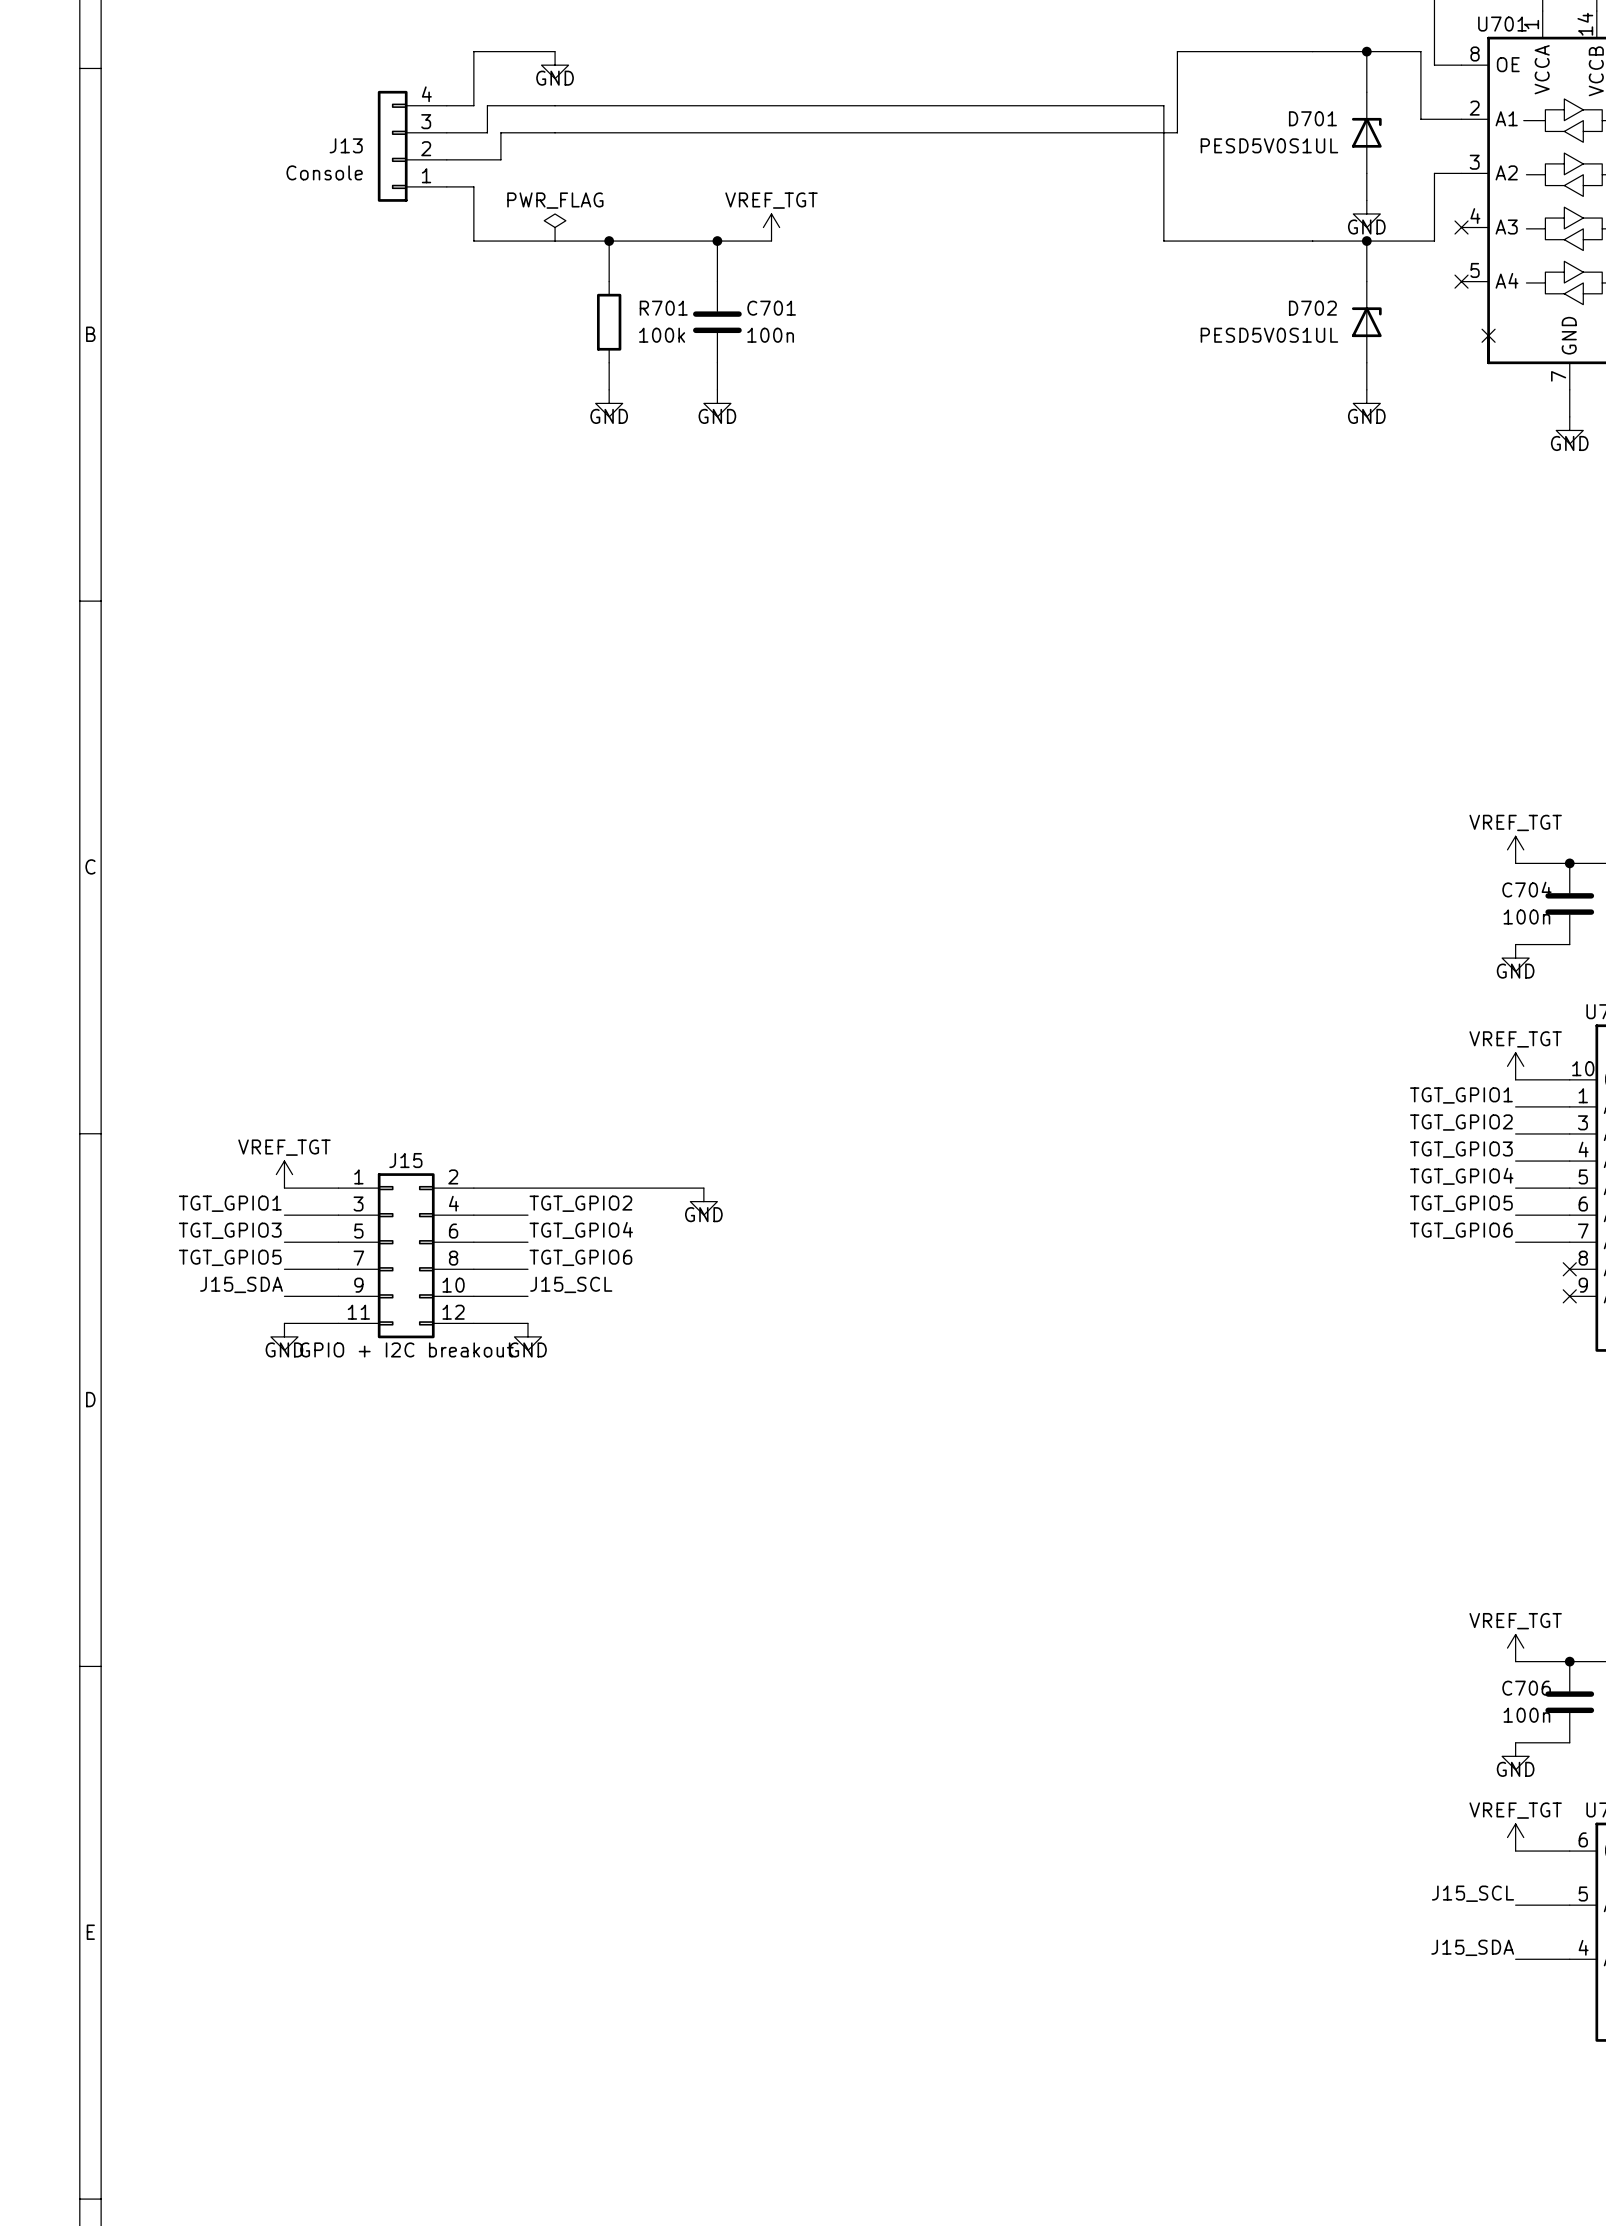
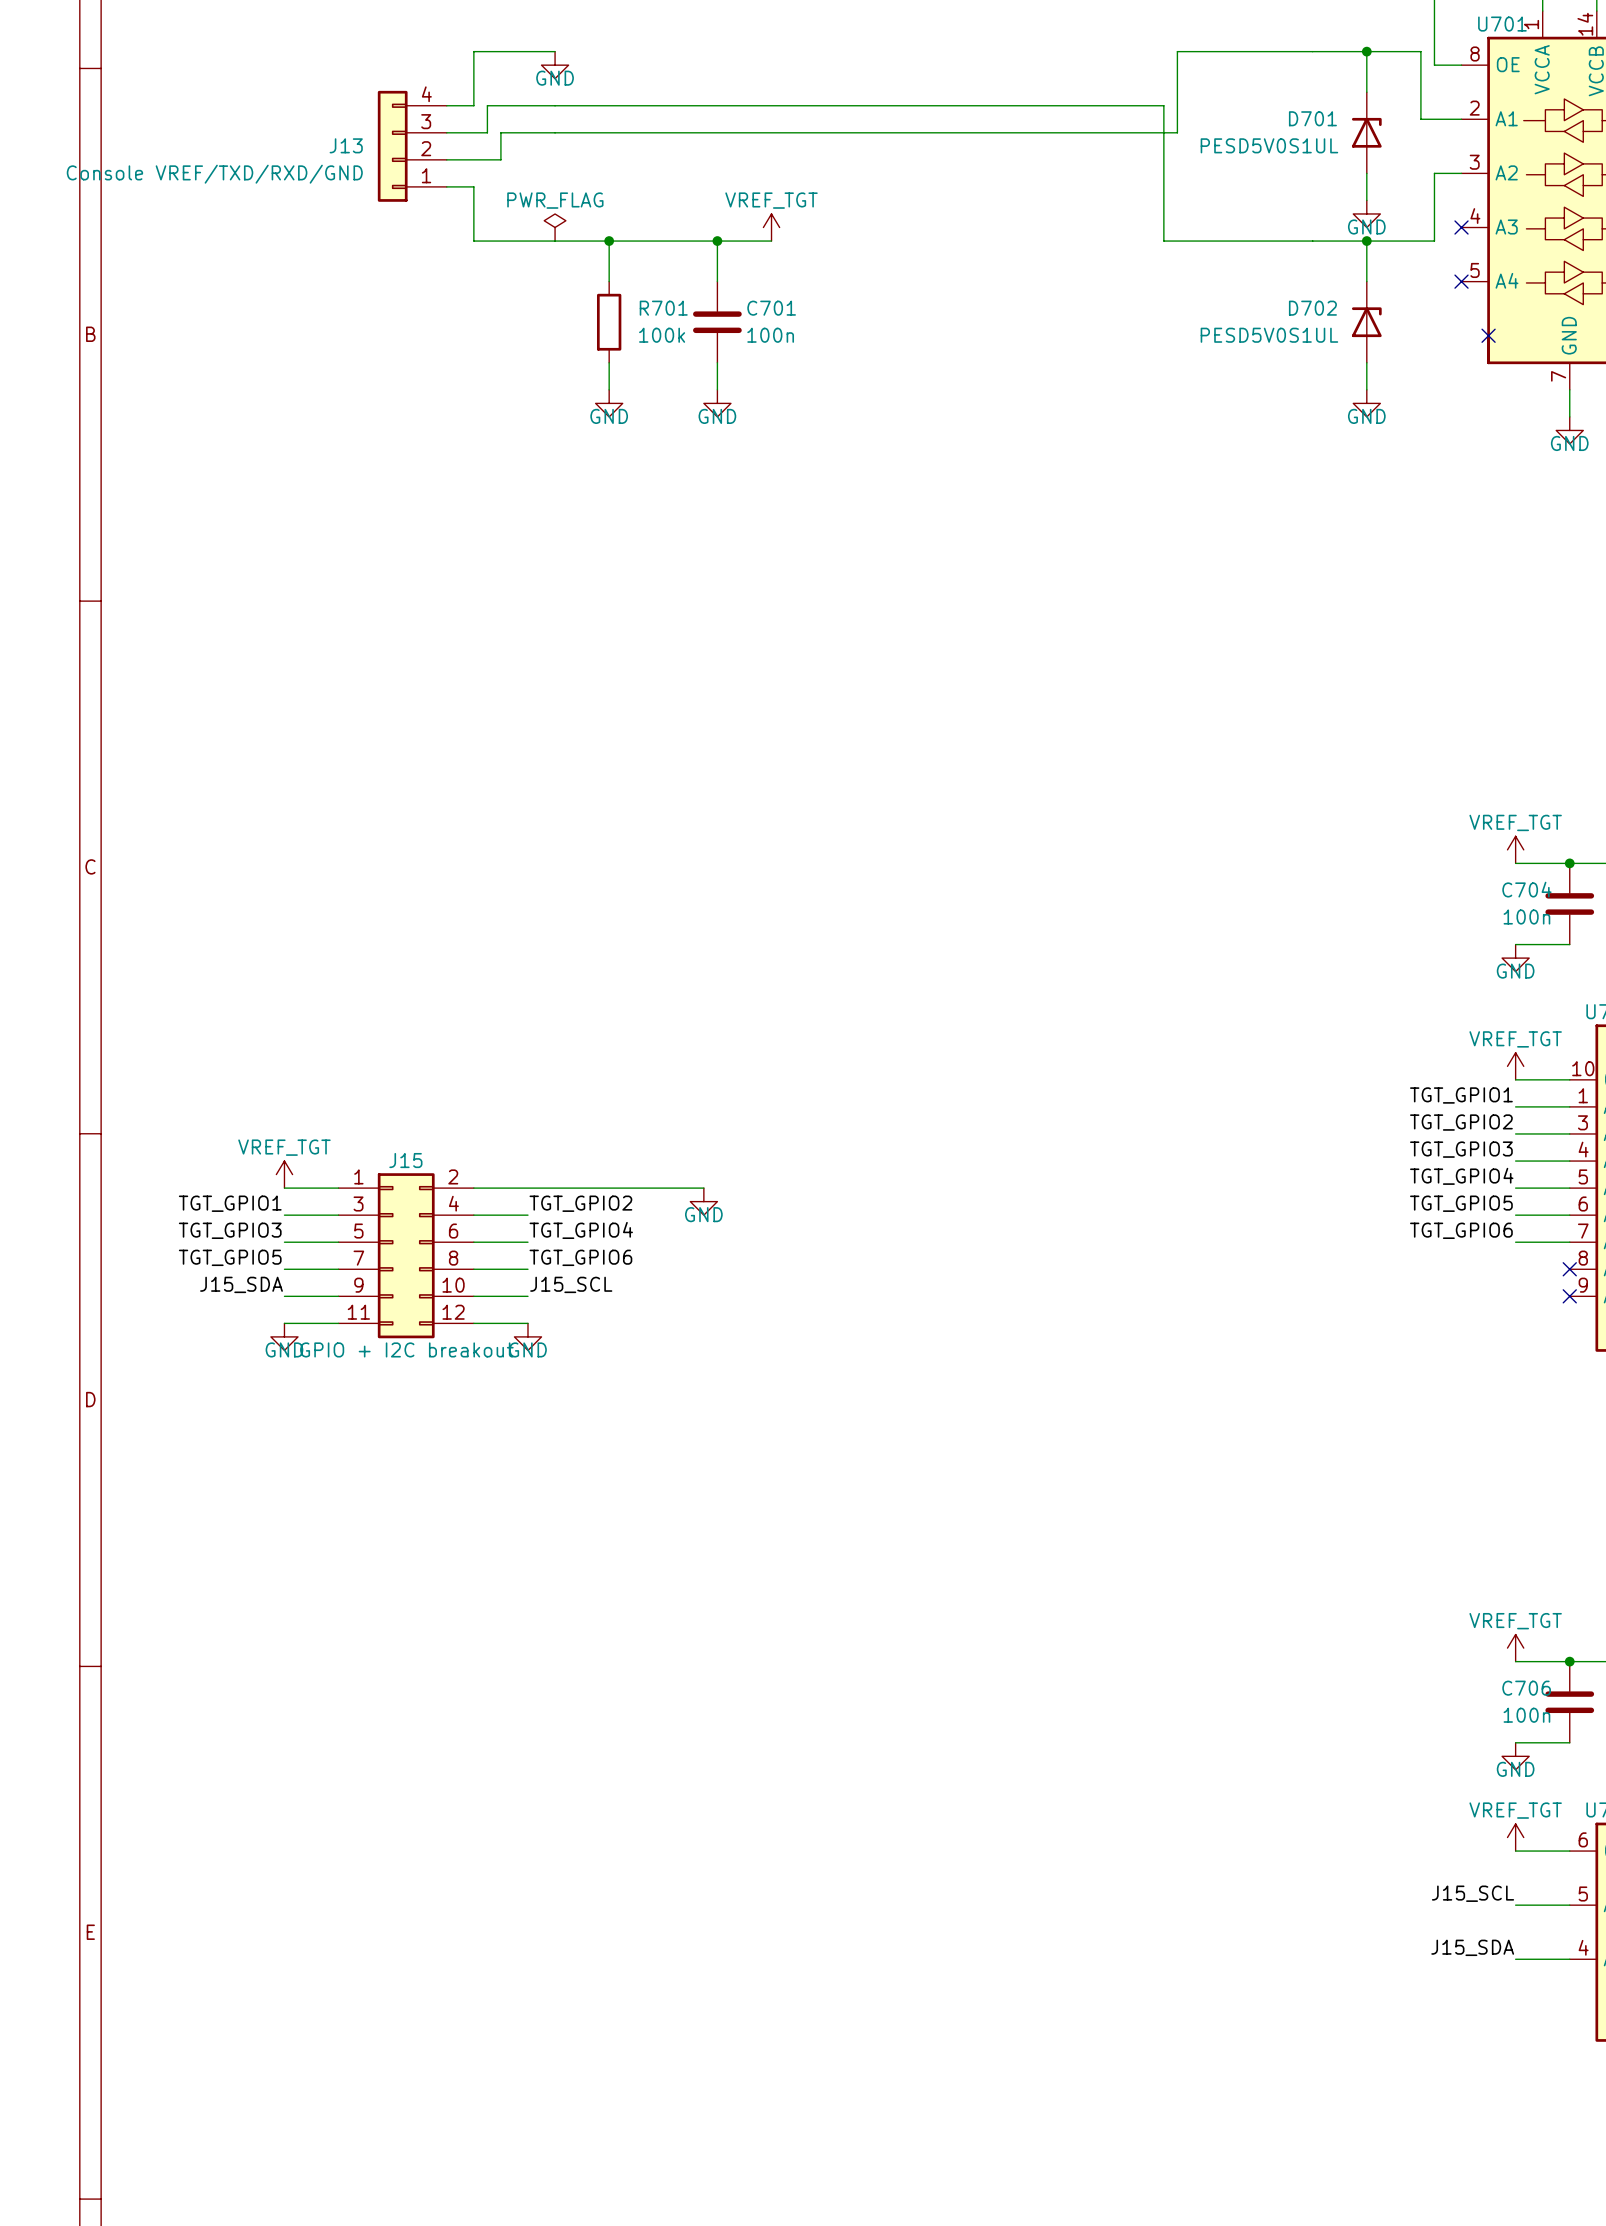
J13 value: Console (324, 172) -> Console VREF/TXD/RXD/GND (214, 174)

